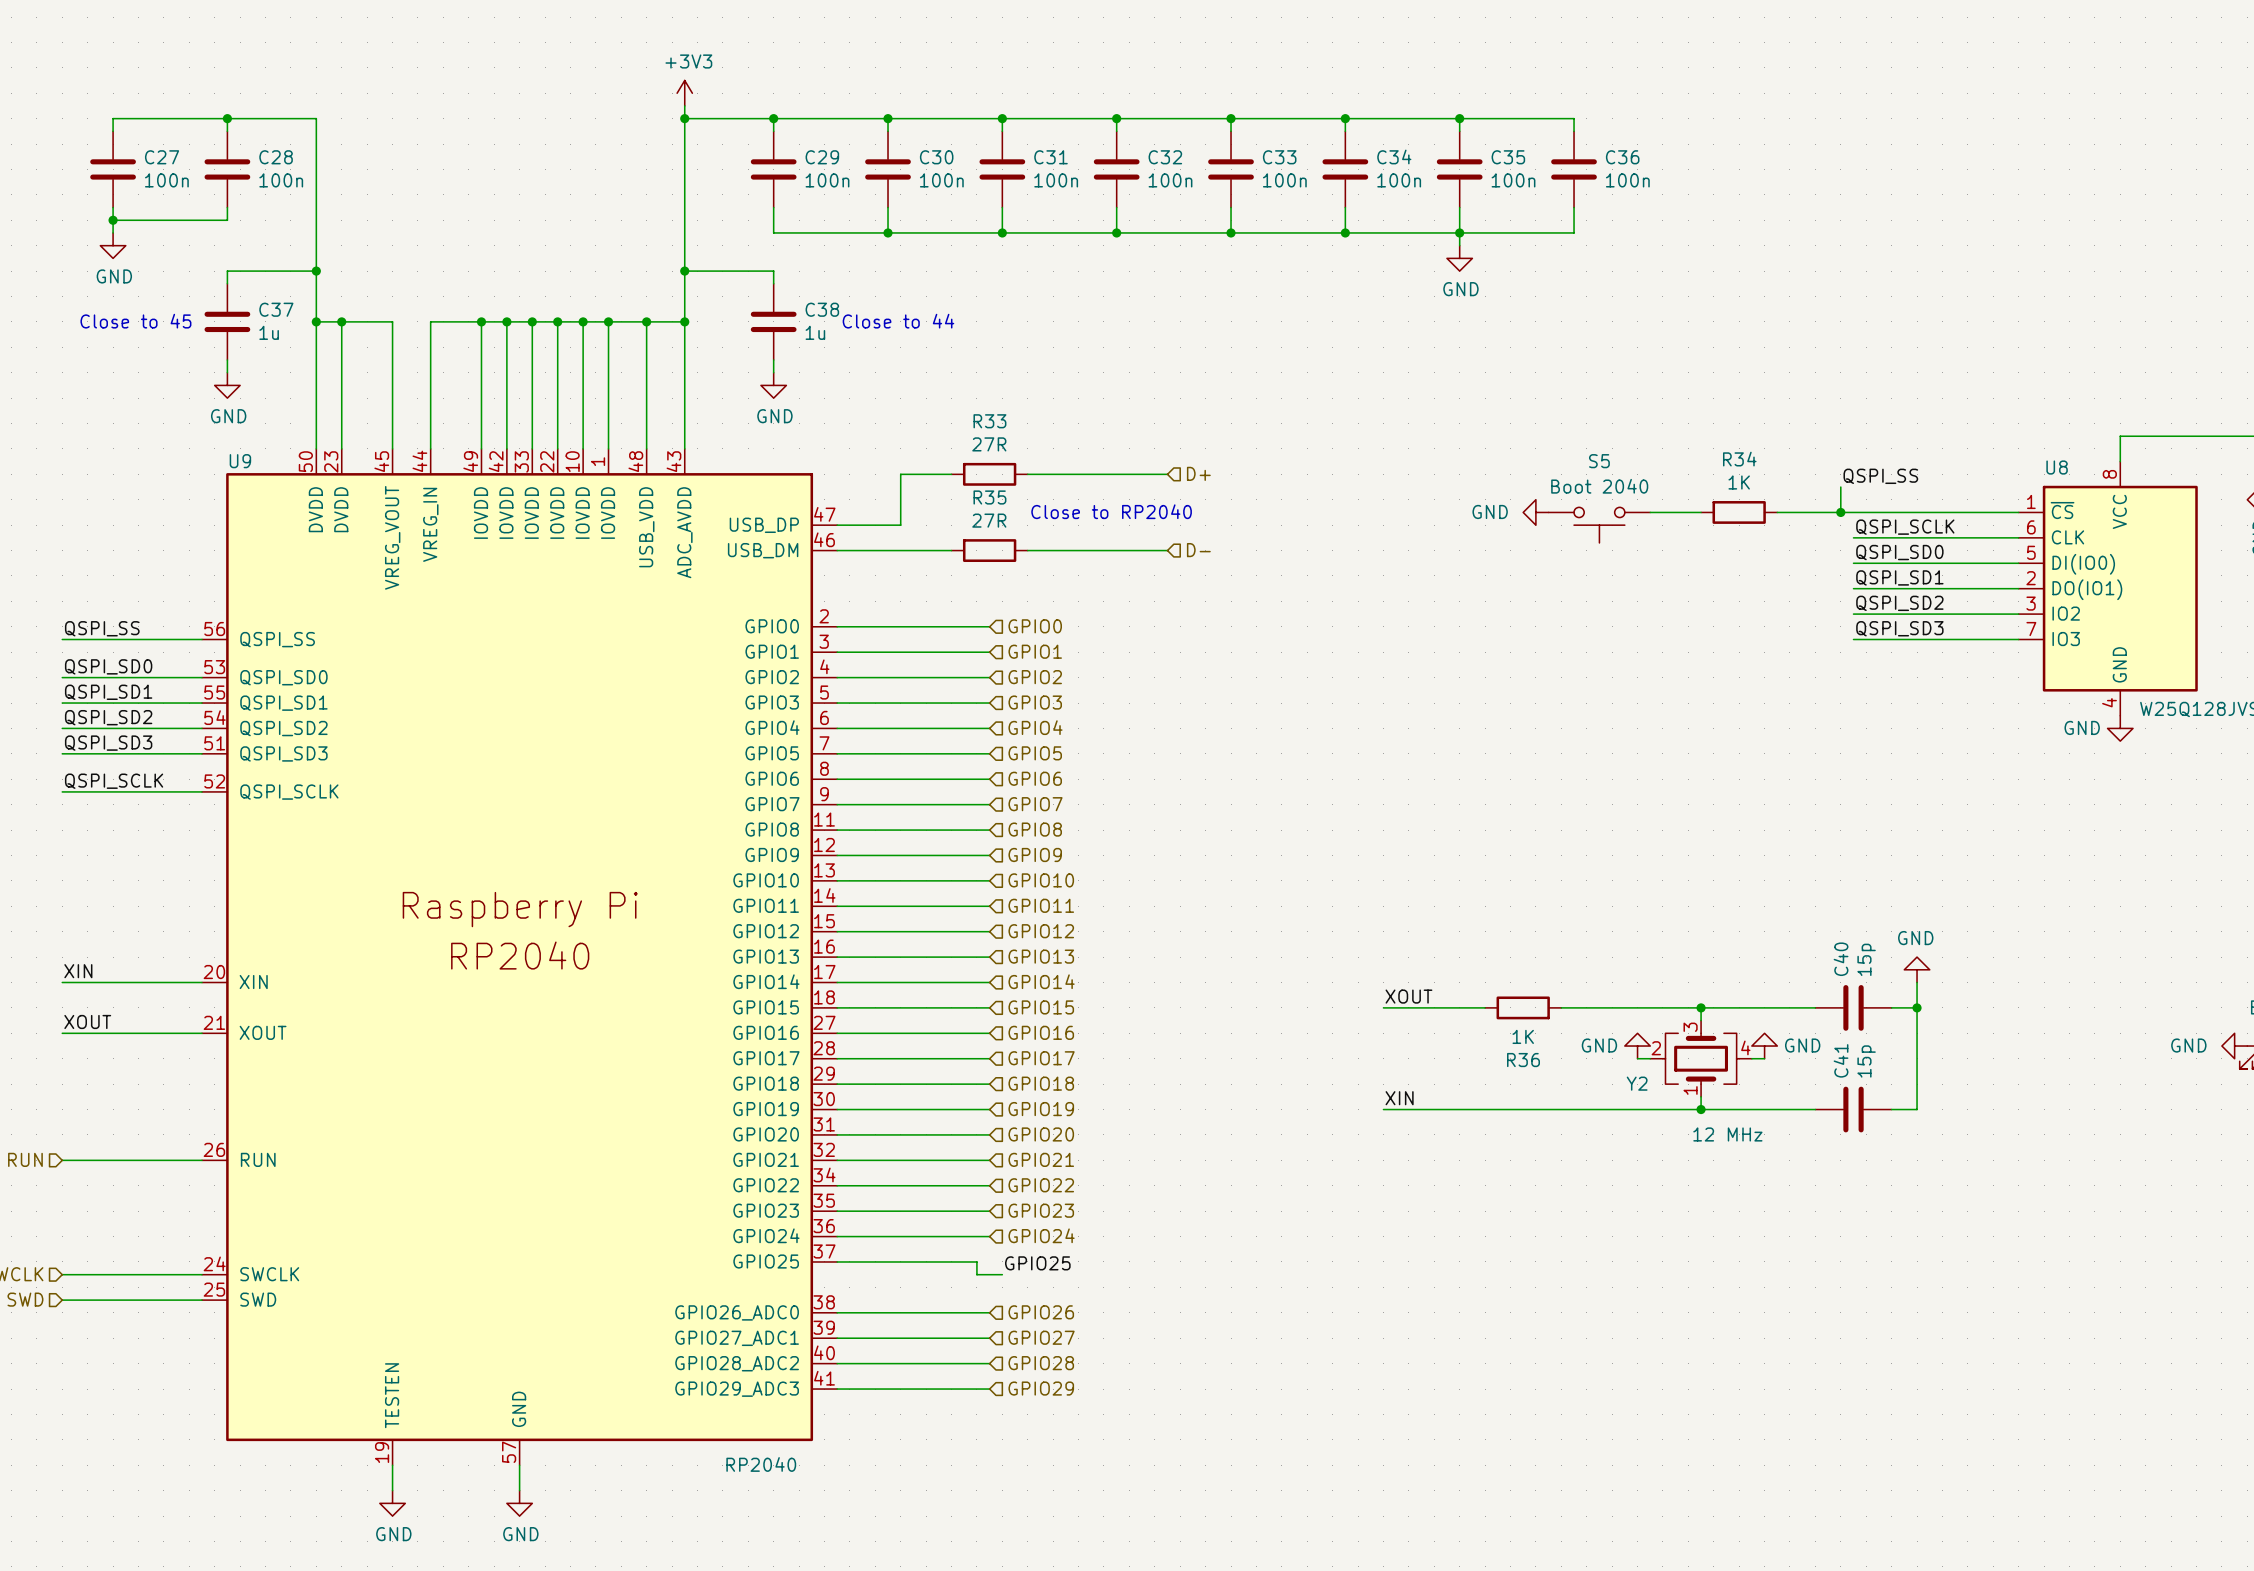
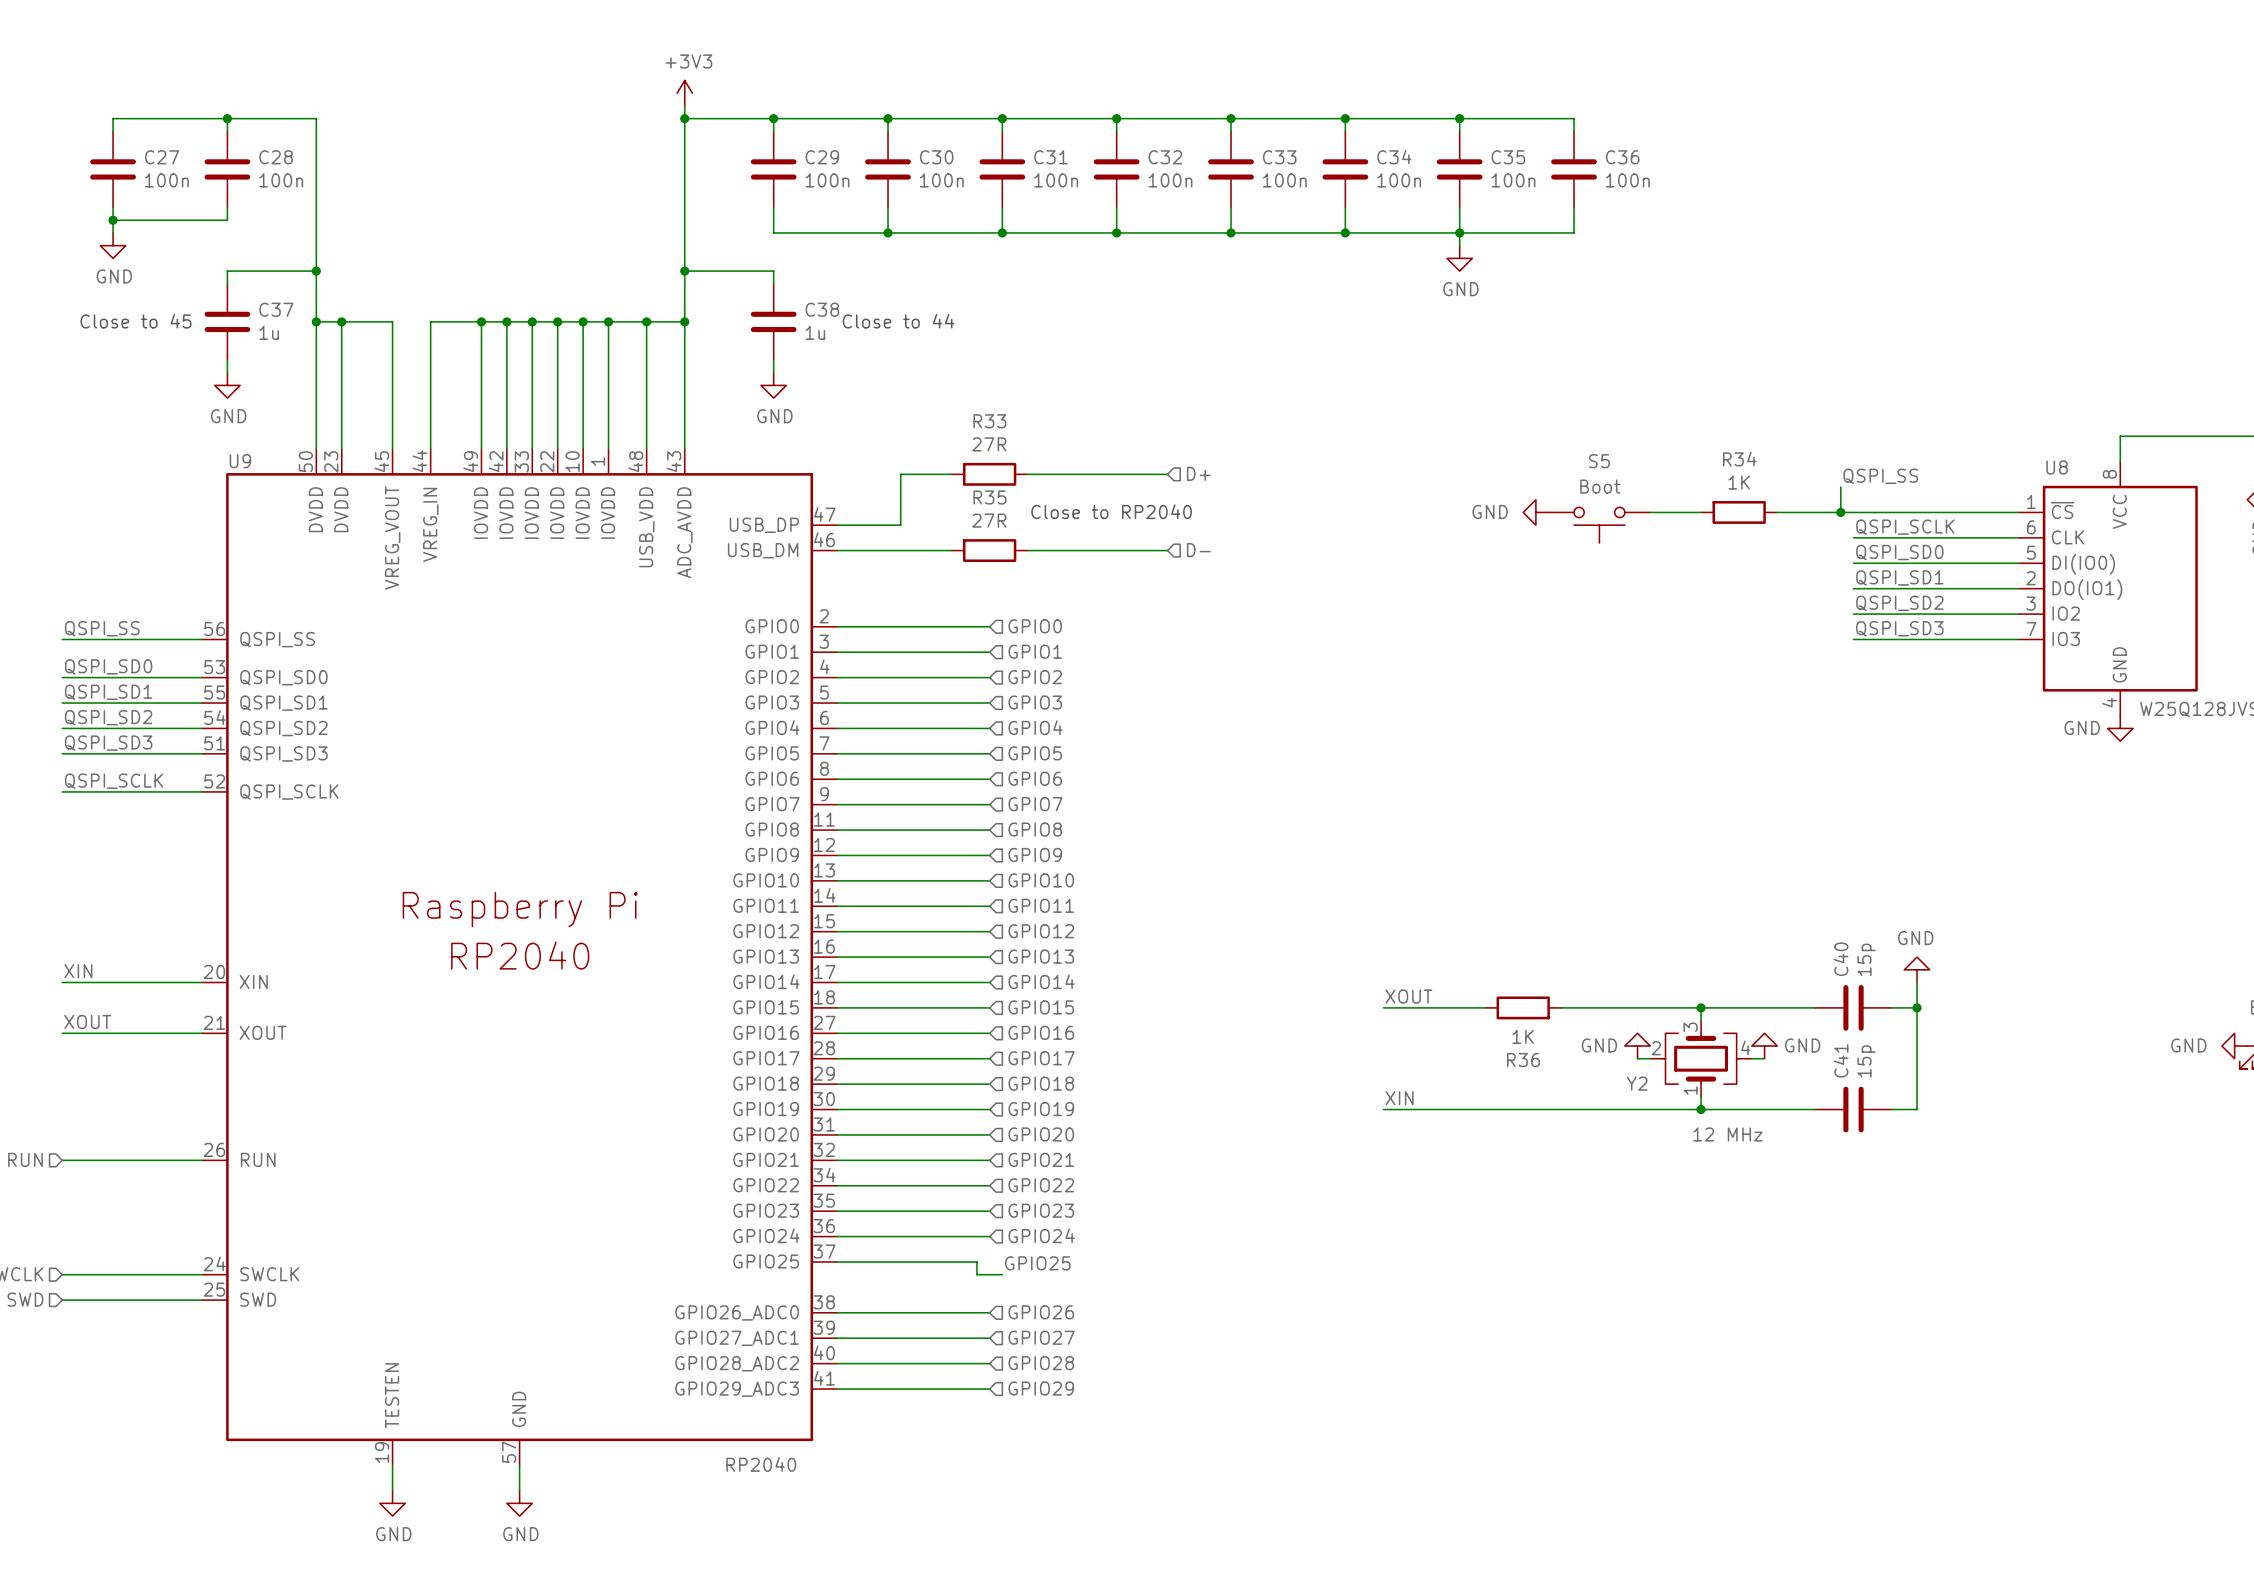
S5 value: Boot 2040 (1599, 486) -> Boot (1600, 486)

